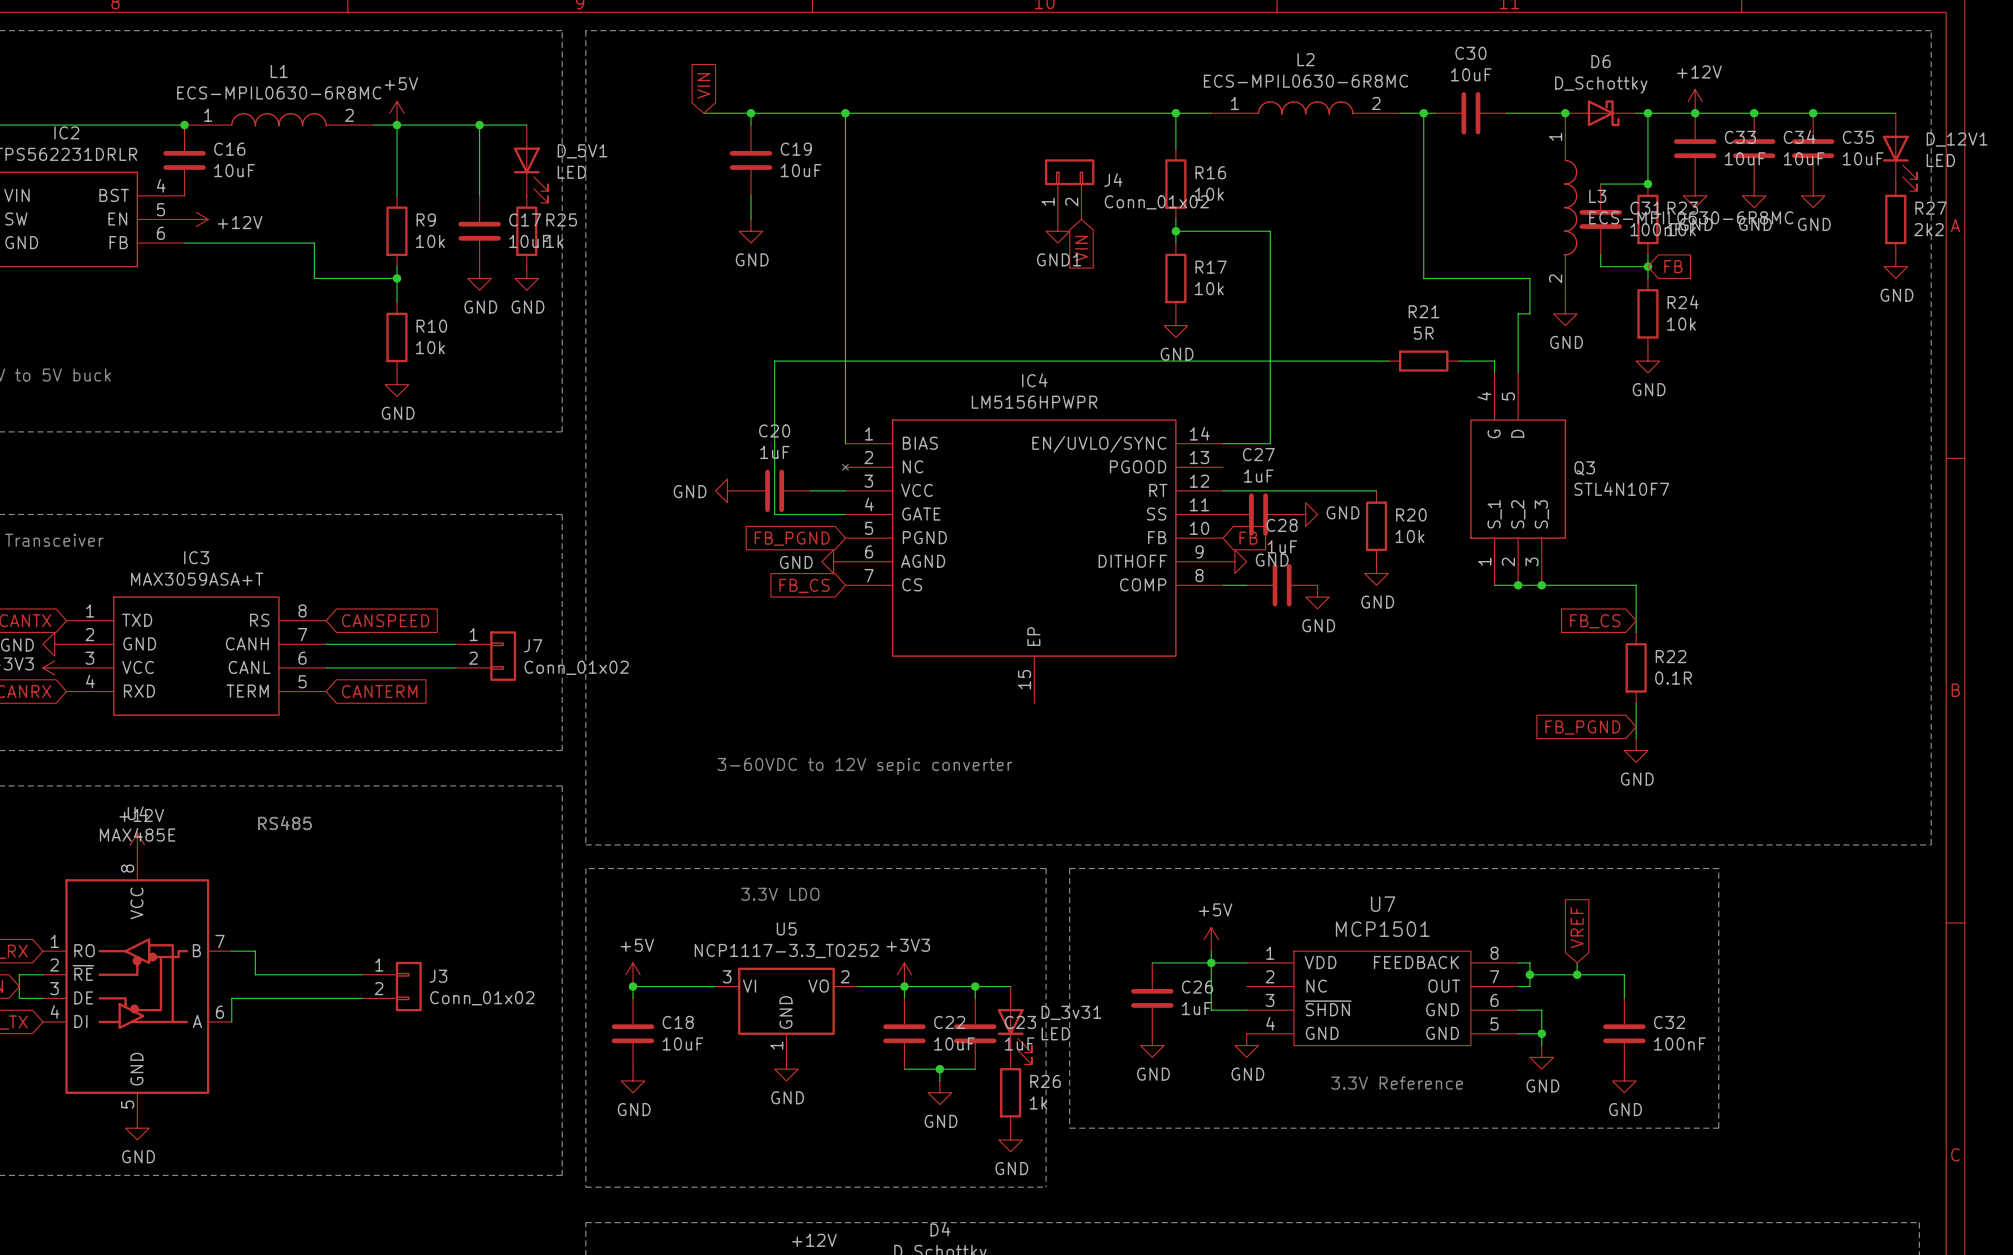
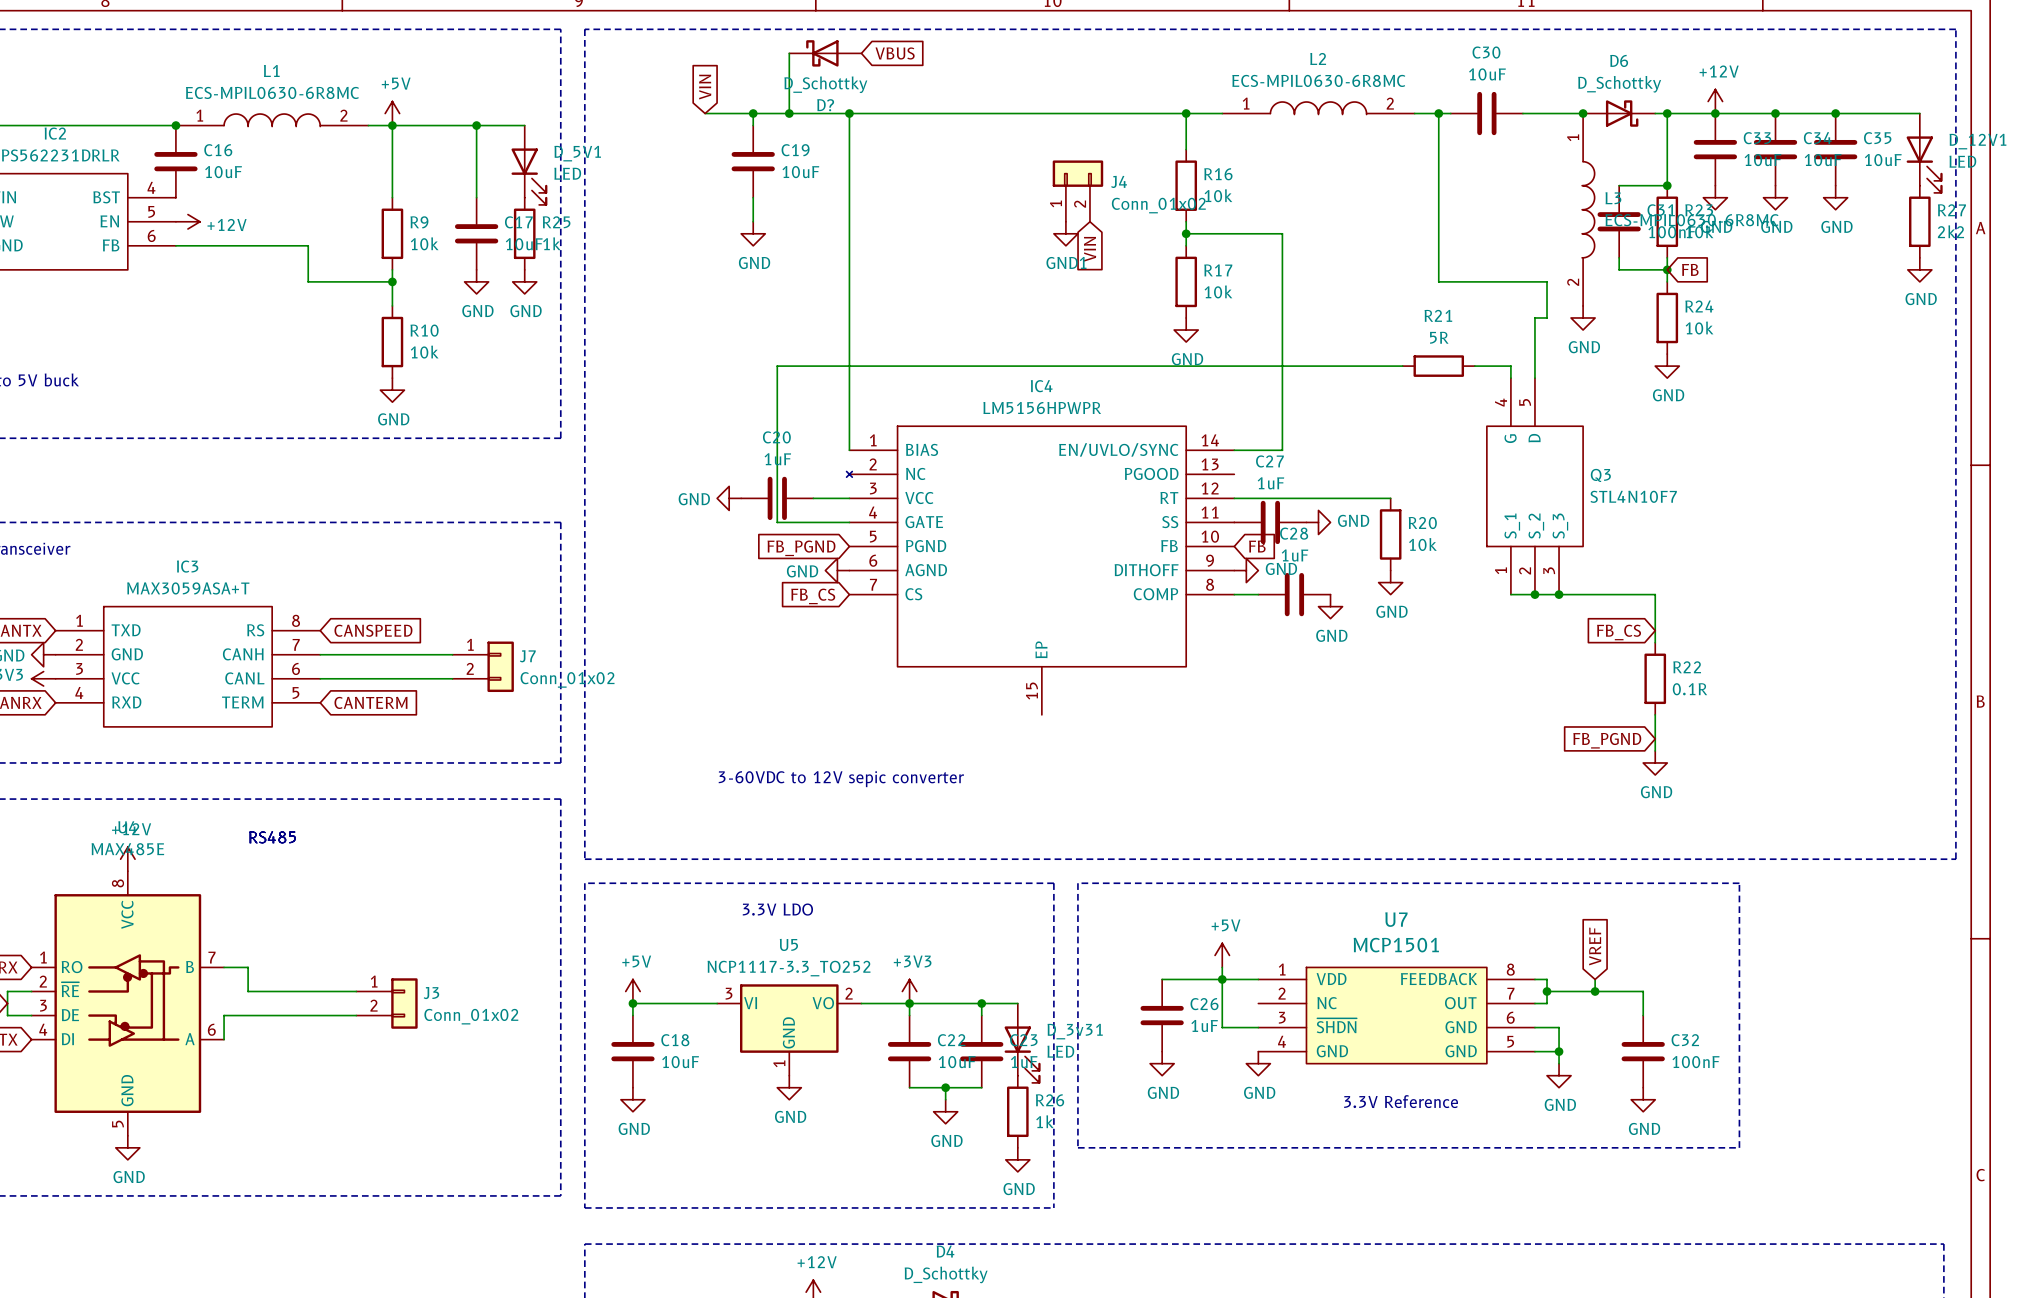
wire: none -> (789, 53) (789, 113)
D?: none -> D_Schottky (825, 53)
global label: none -> VBUS (895, 53)
junction: none -> (789, 113)

